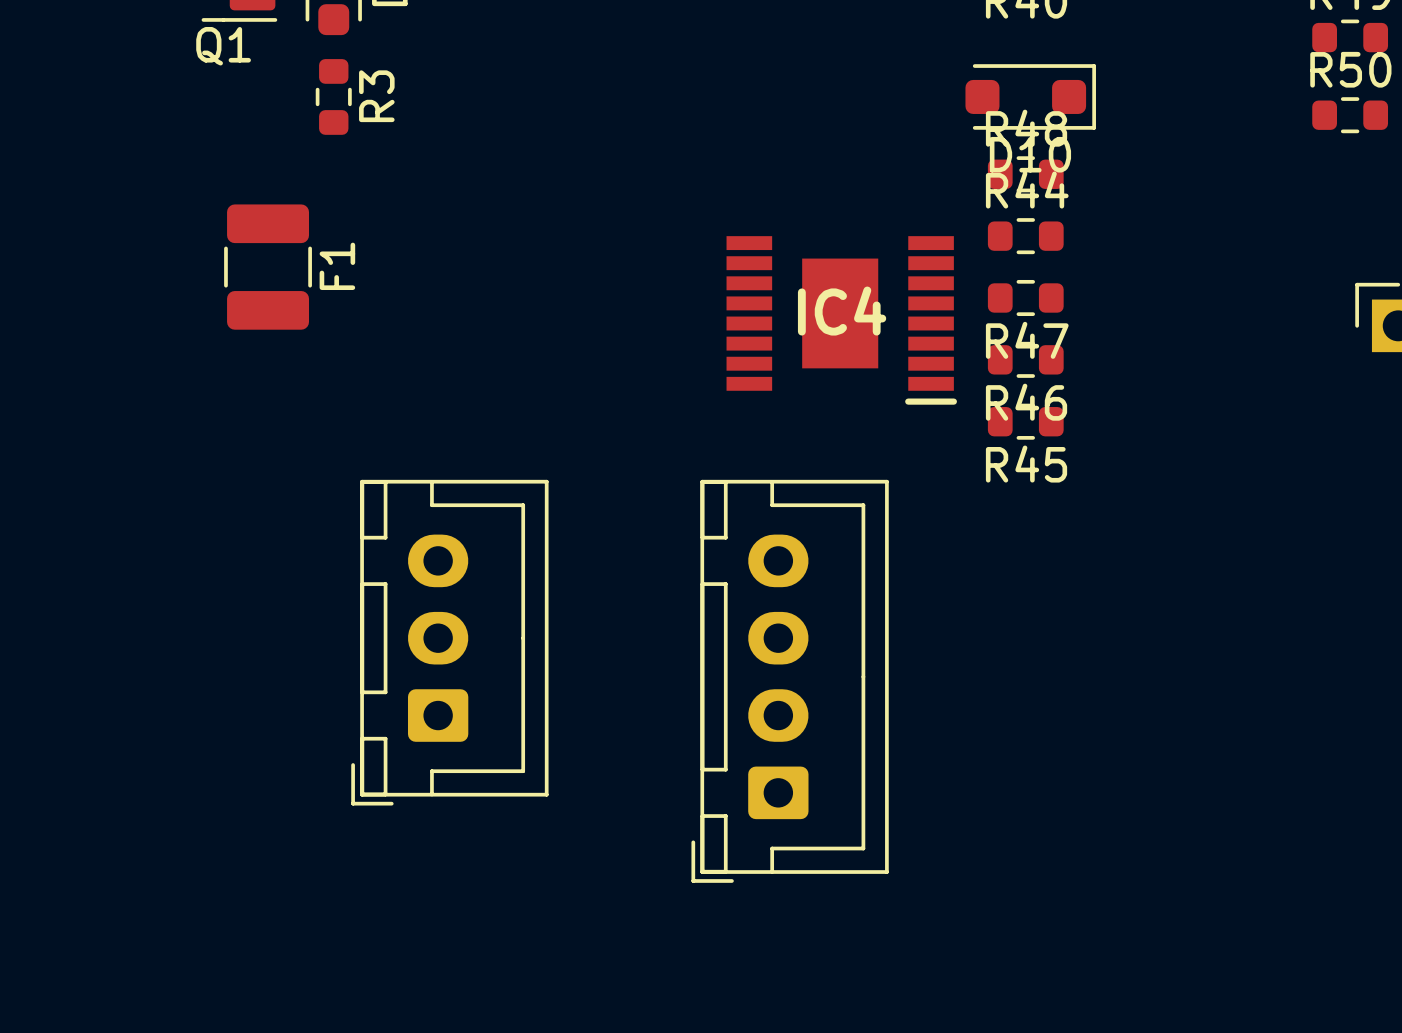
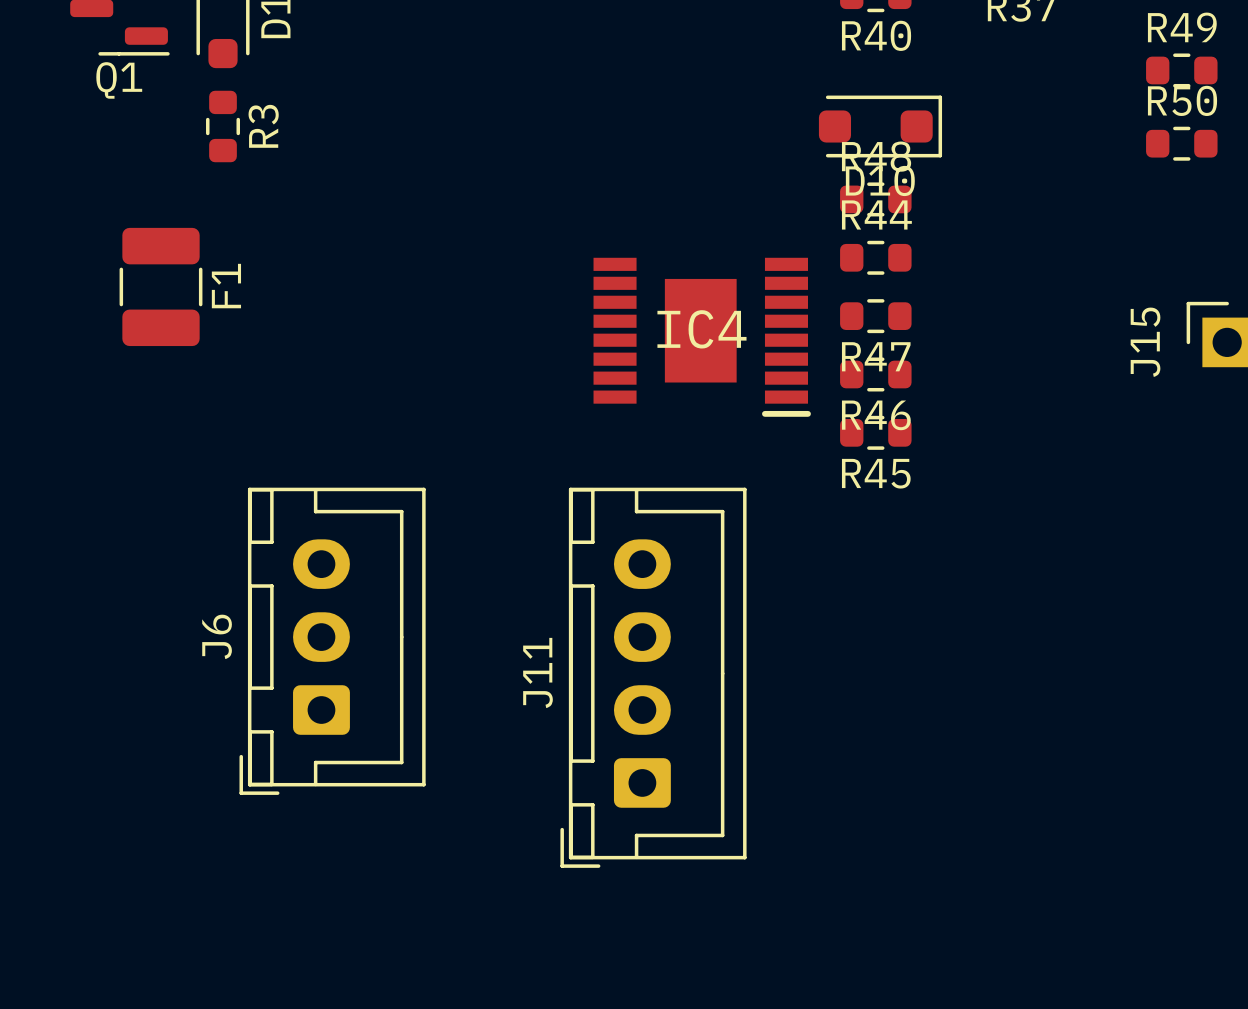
J15 name: none -> J15 (1145, 342)
J6 name: none -> J6 (217, 636)
J11 name: none -> J11 (537, 672)

